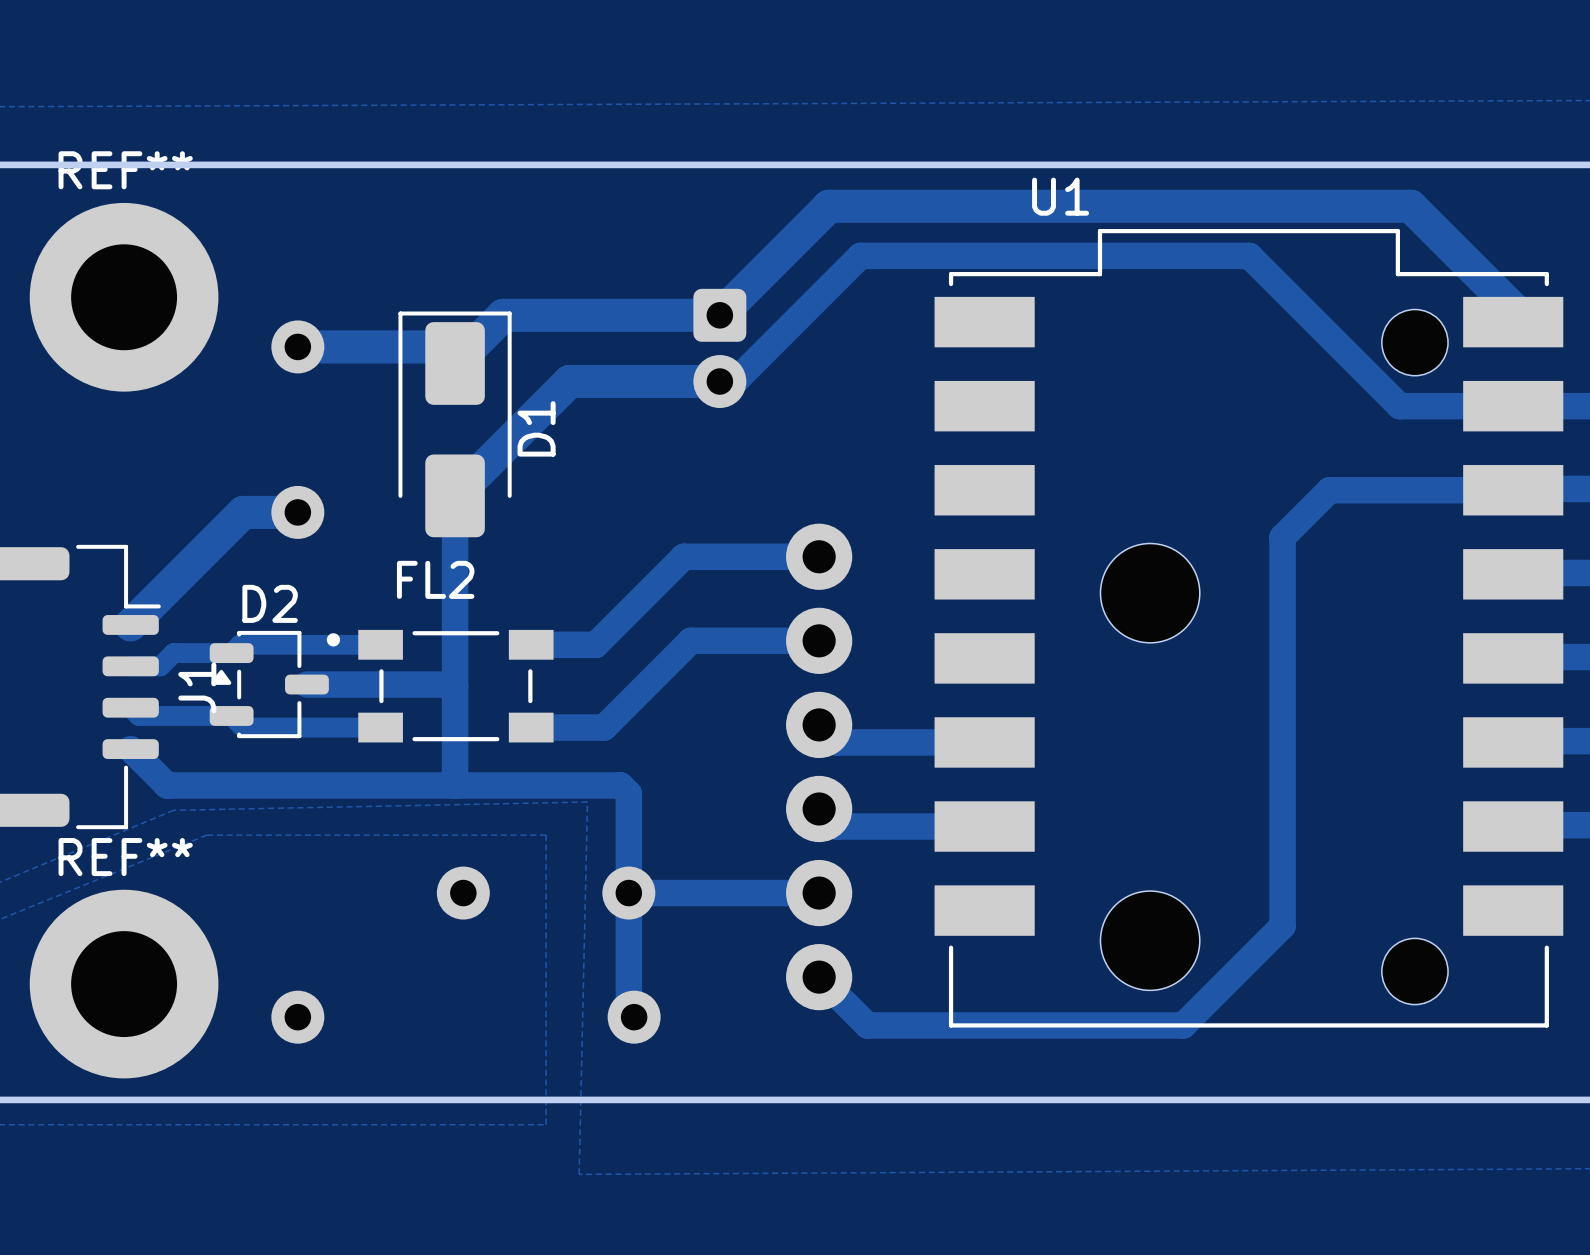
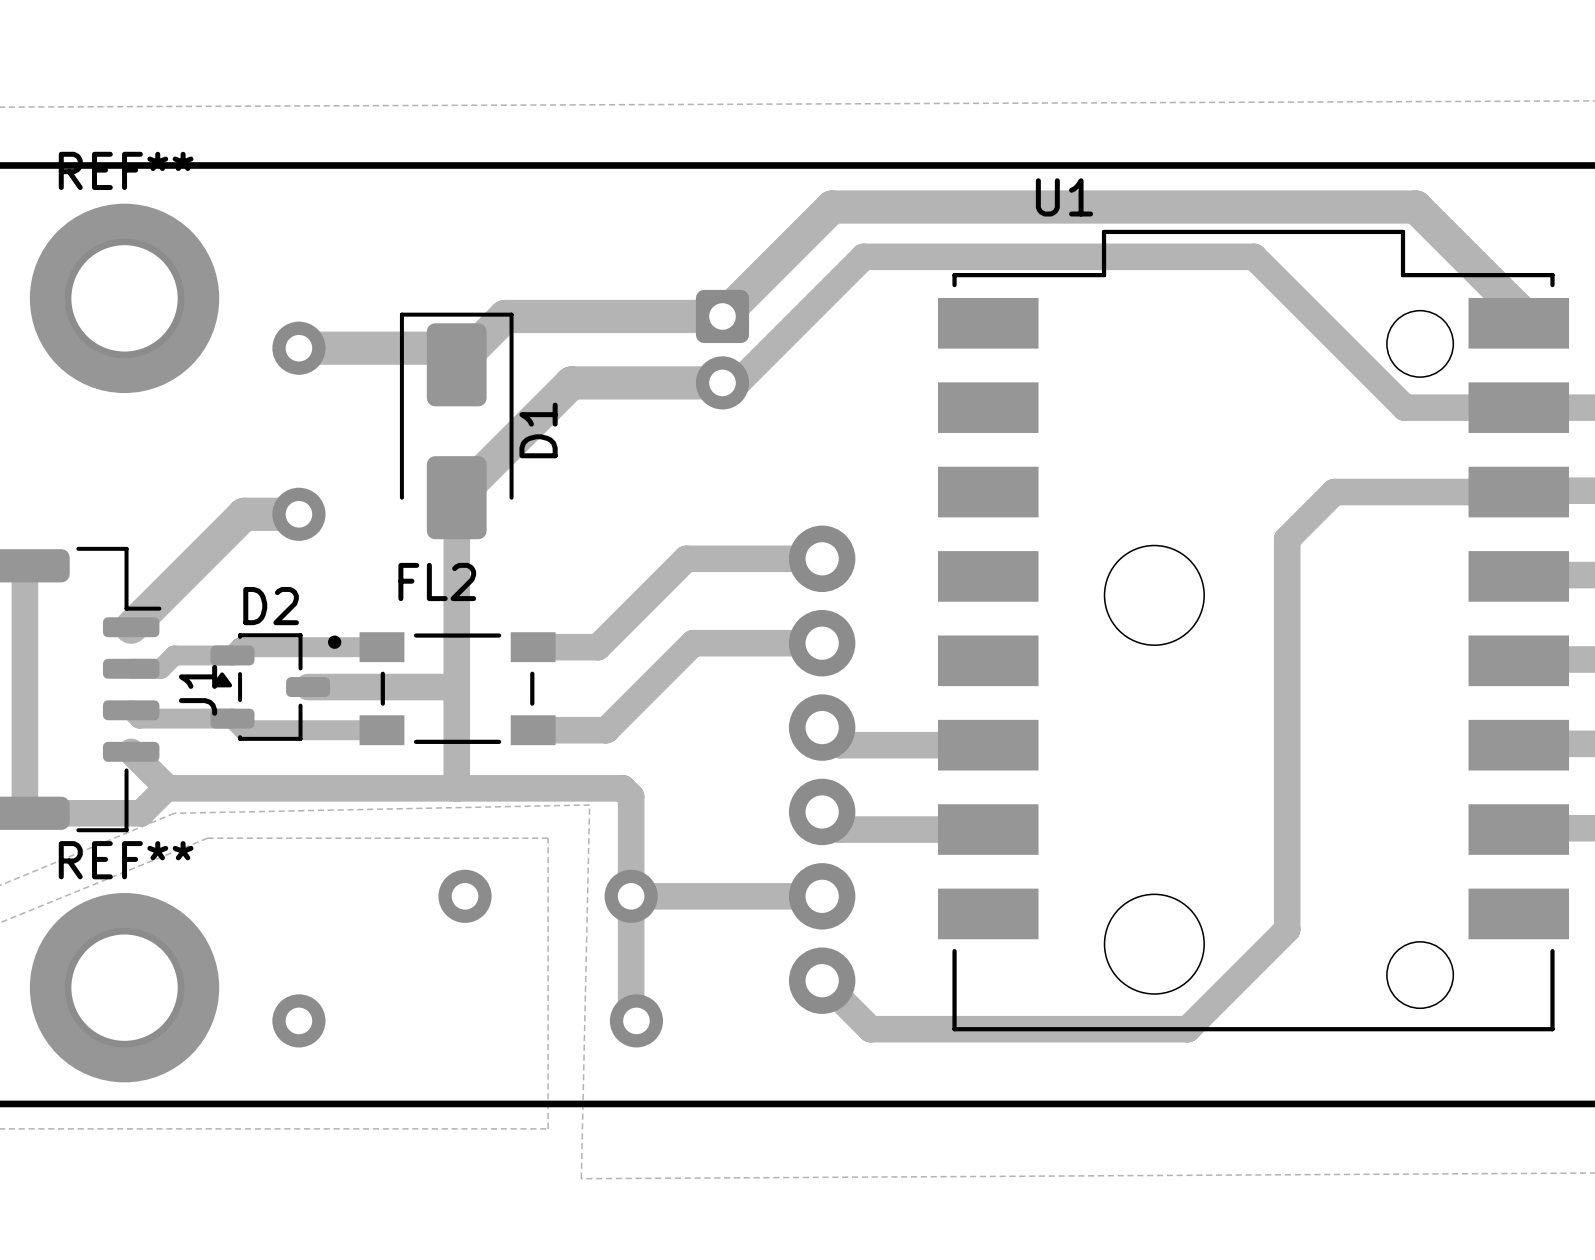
track: none -> (24, 565) (24, 813) (141, 813) (166, 787)

